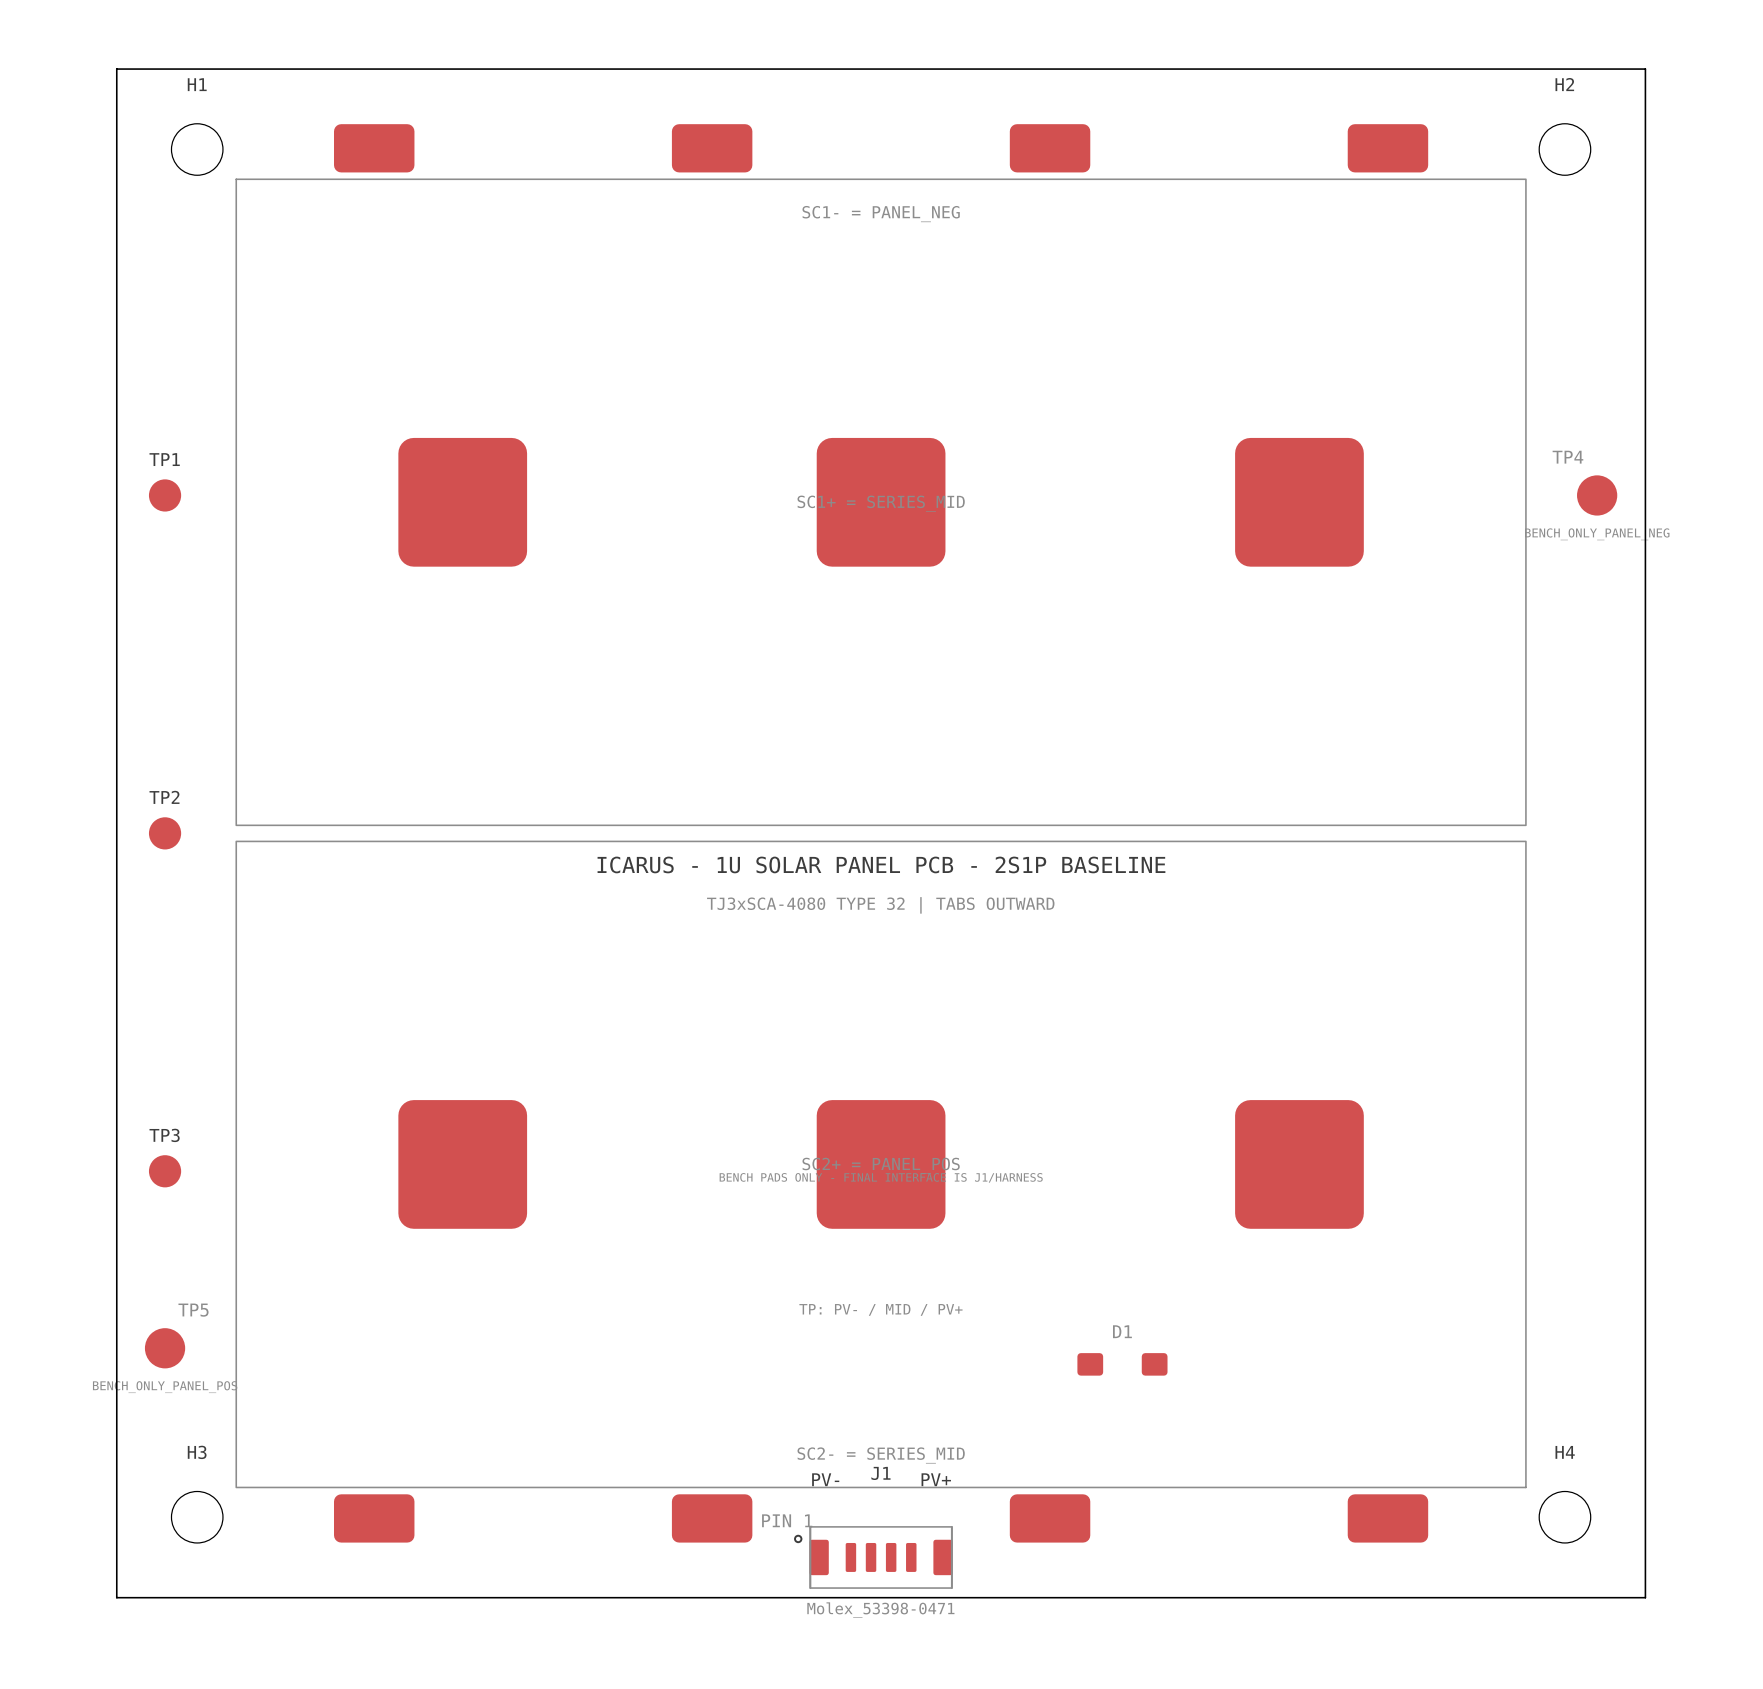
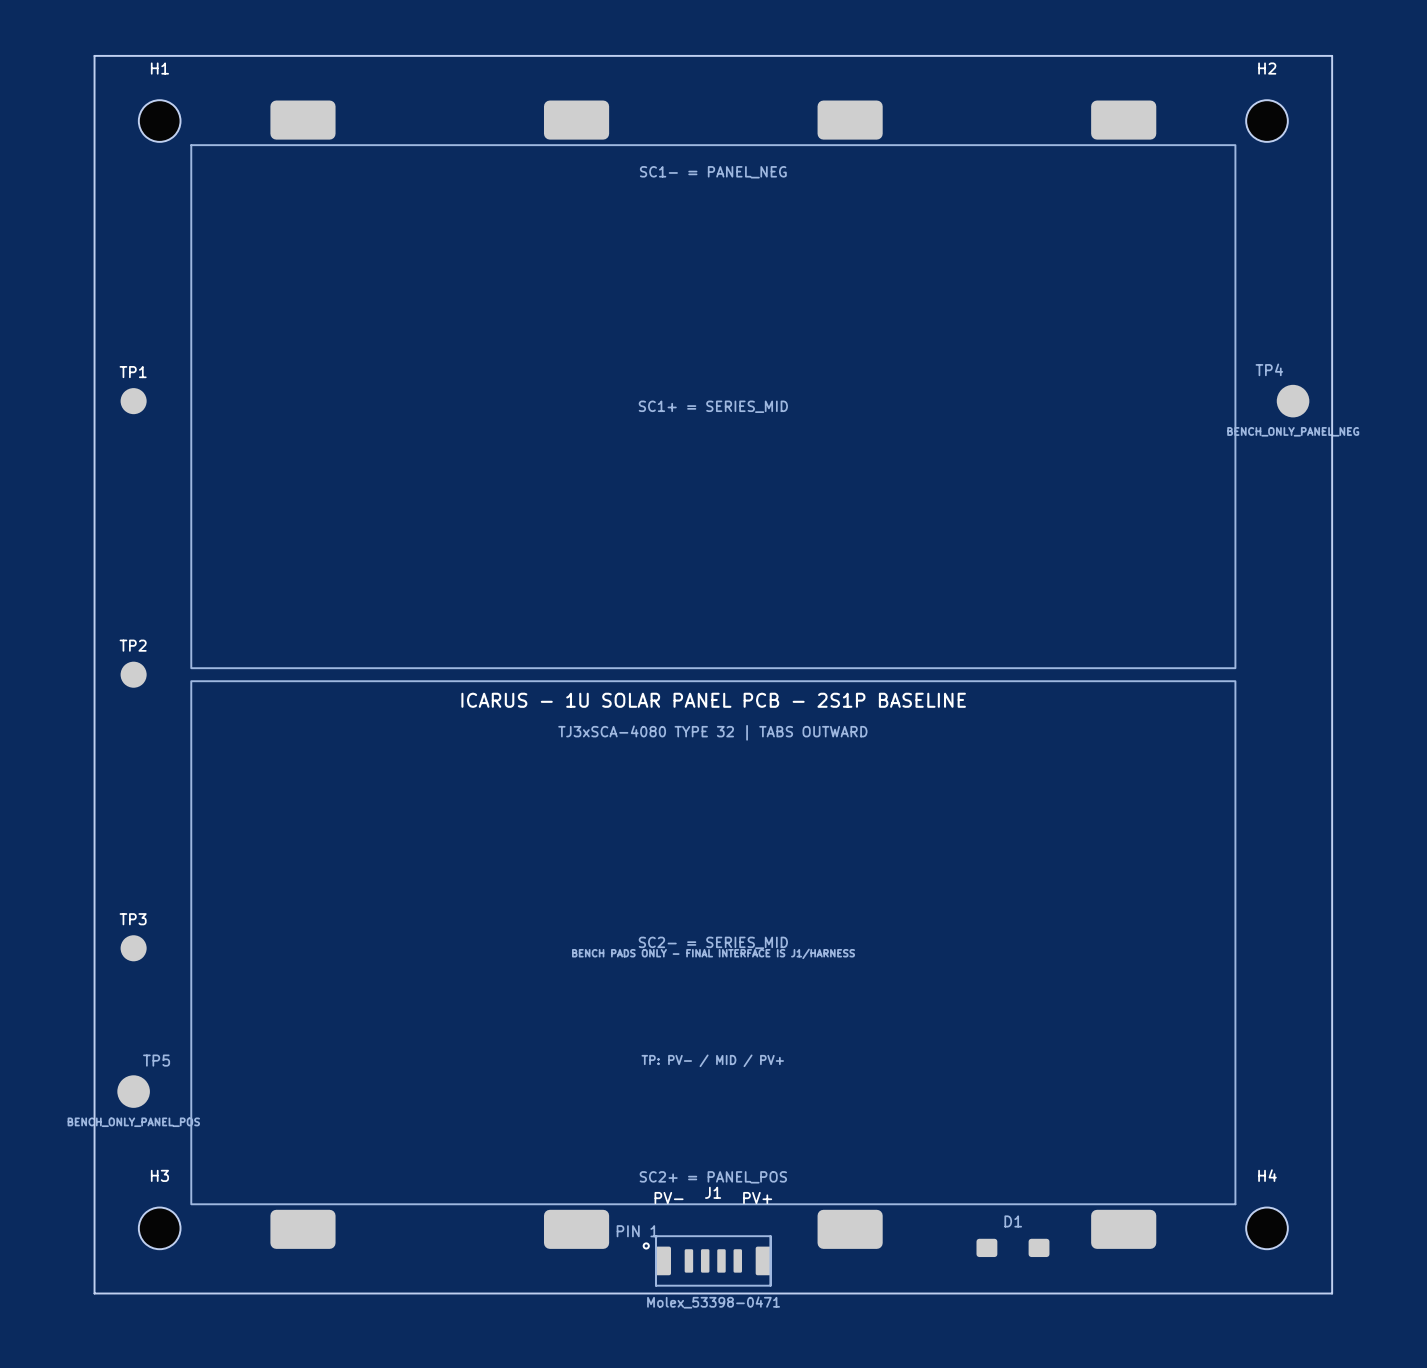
part footprint: [235, 124, 1527, 827] -> [190, 100, 1237, 669]
part footprint: [235, 840, 1527, 1543] -> [190, 680, 1237, 1249]
D1 position: (1122, 1364) -> (1012, 1247)

